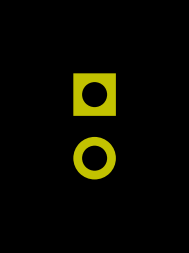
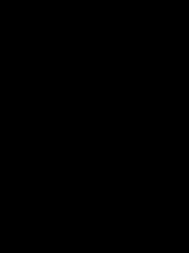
part: (94, 126) -> none

